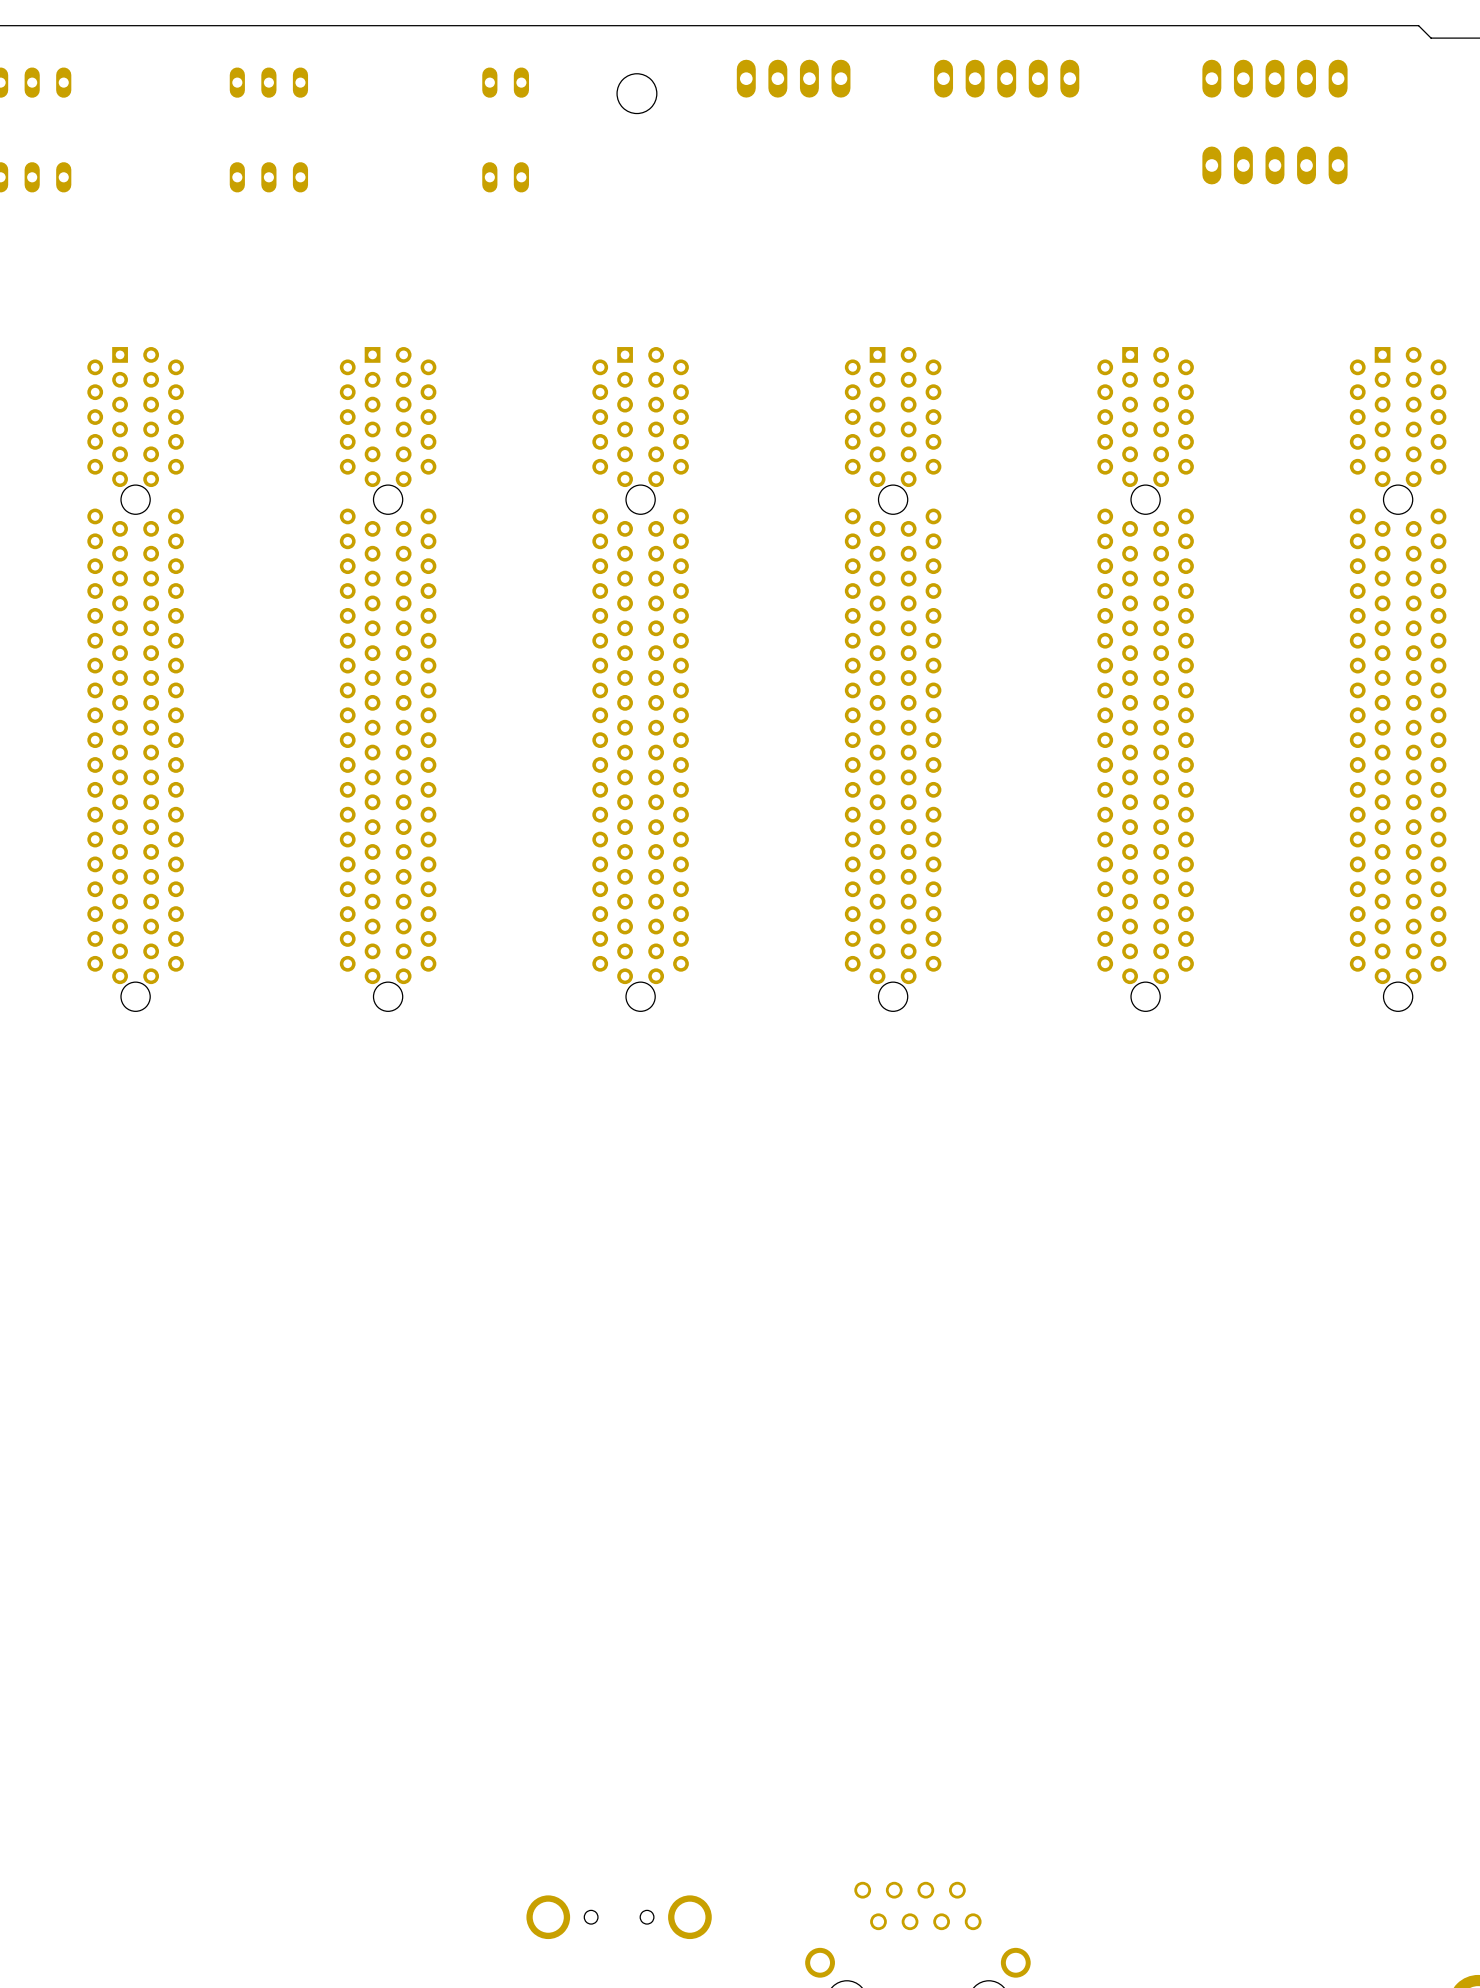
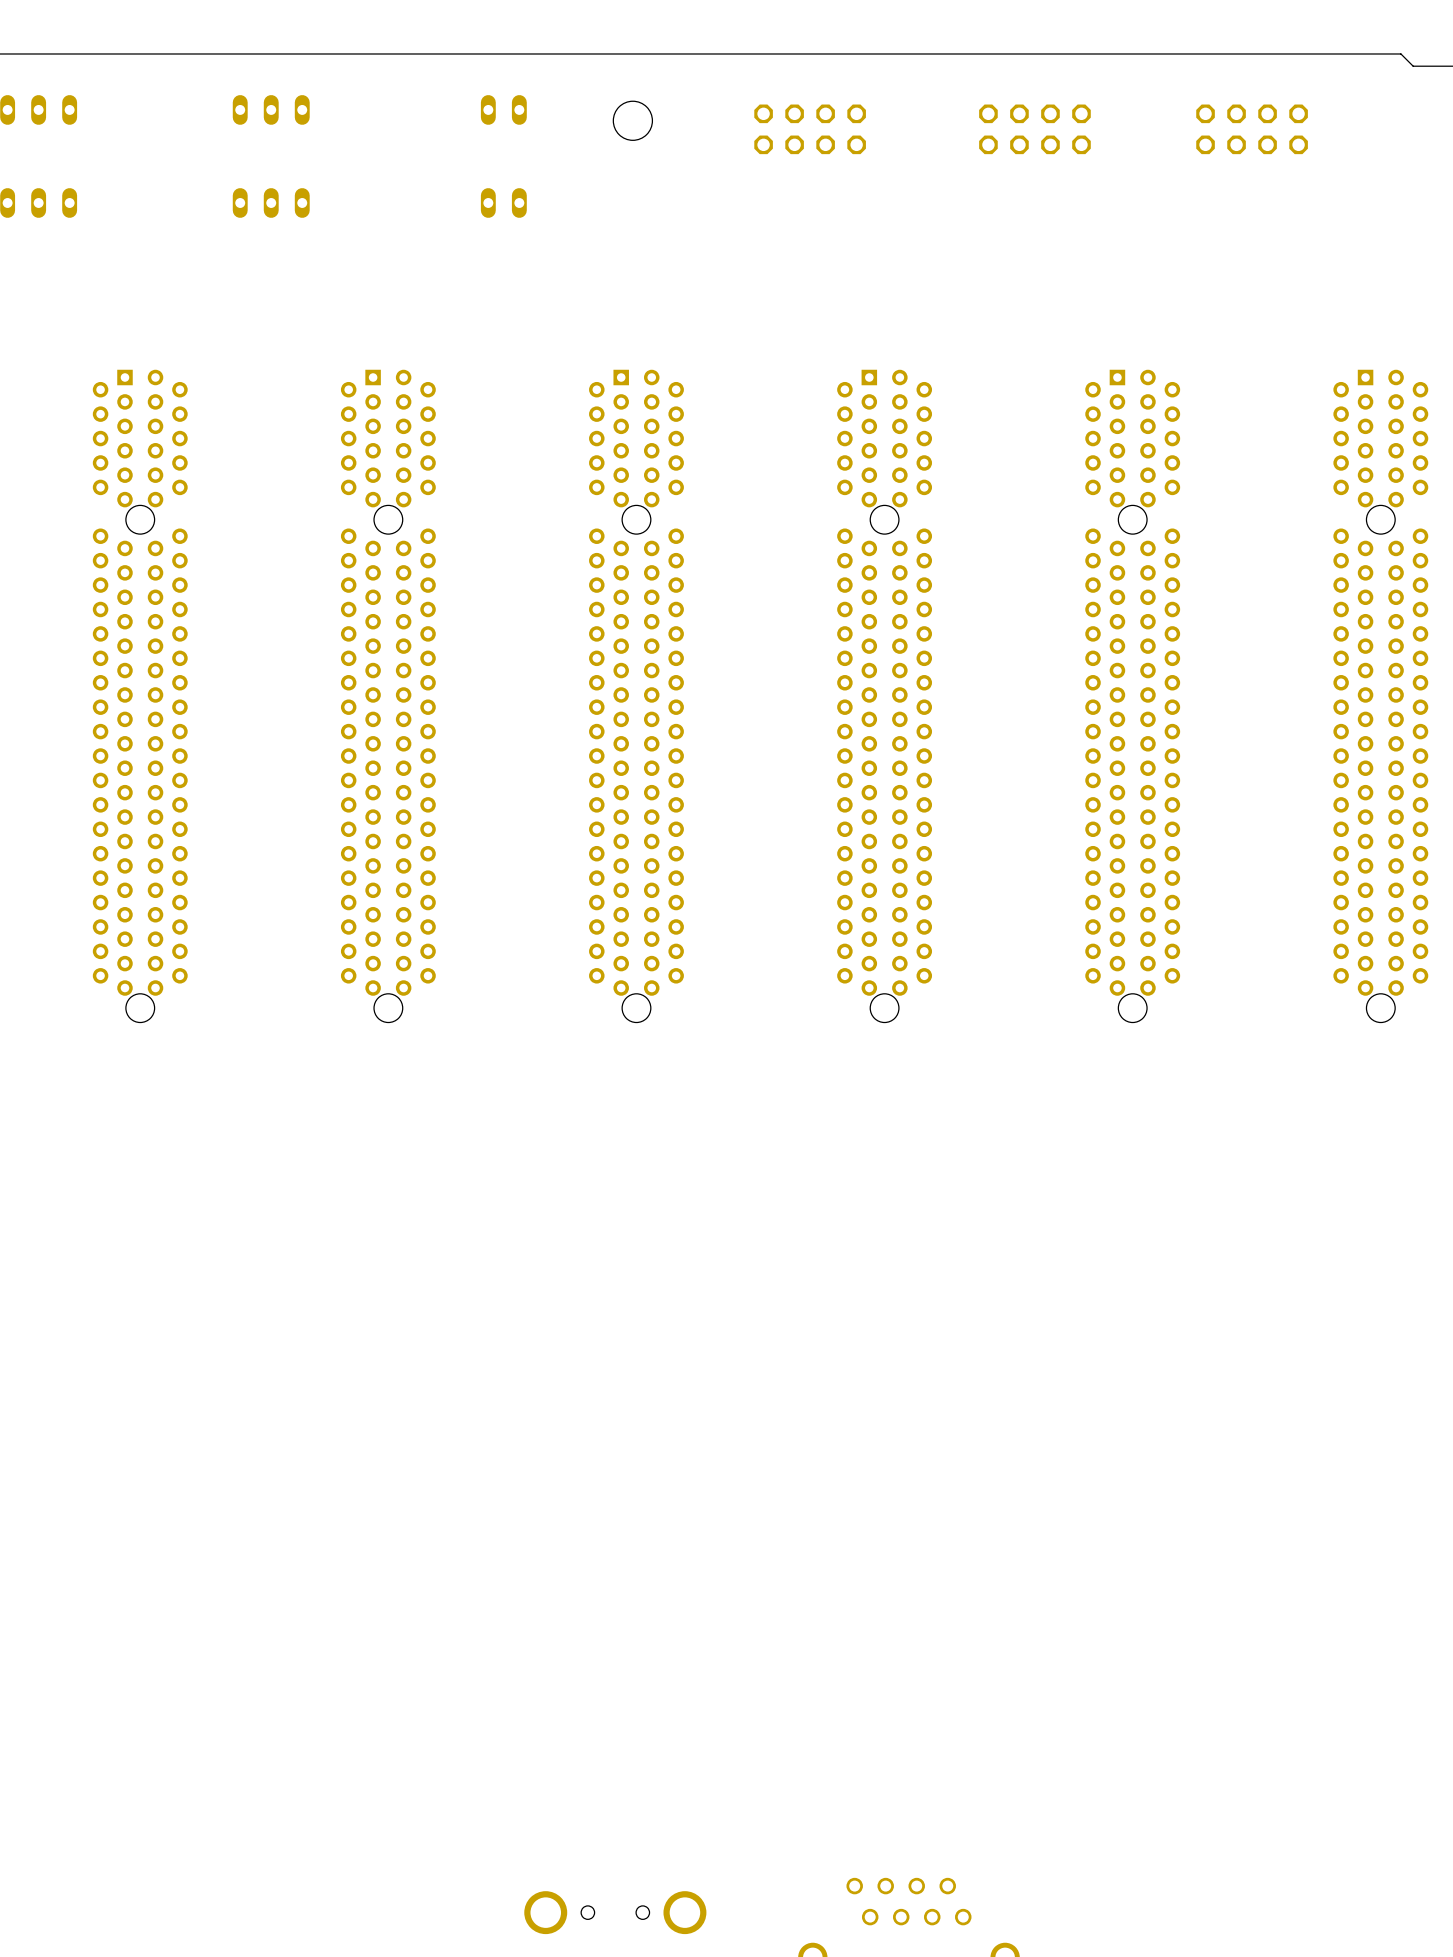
part: (793, 78) -> none
part: (1006, 78) -> none
part: (1274, 78) -> none
part: none -> (810, 129)
part: none -> (1034, 129)
part: none -> (1252, 129)
part: (1274, 165) -> none

